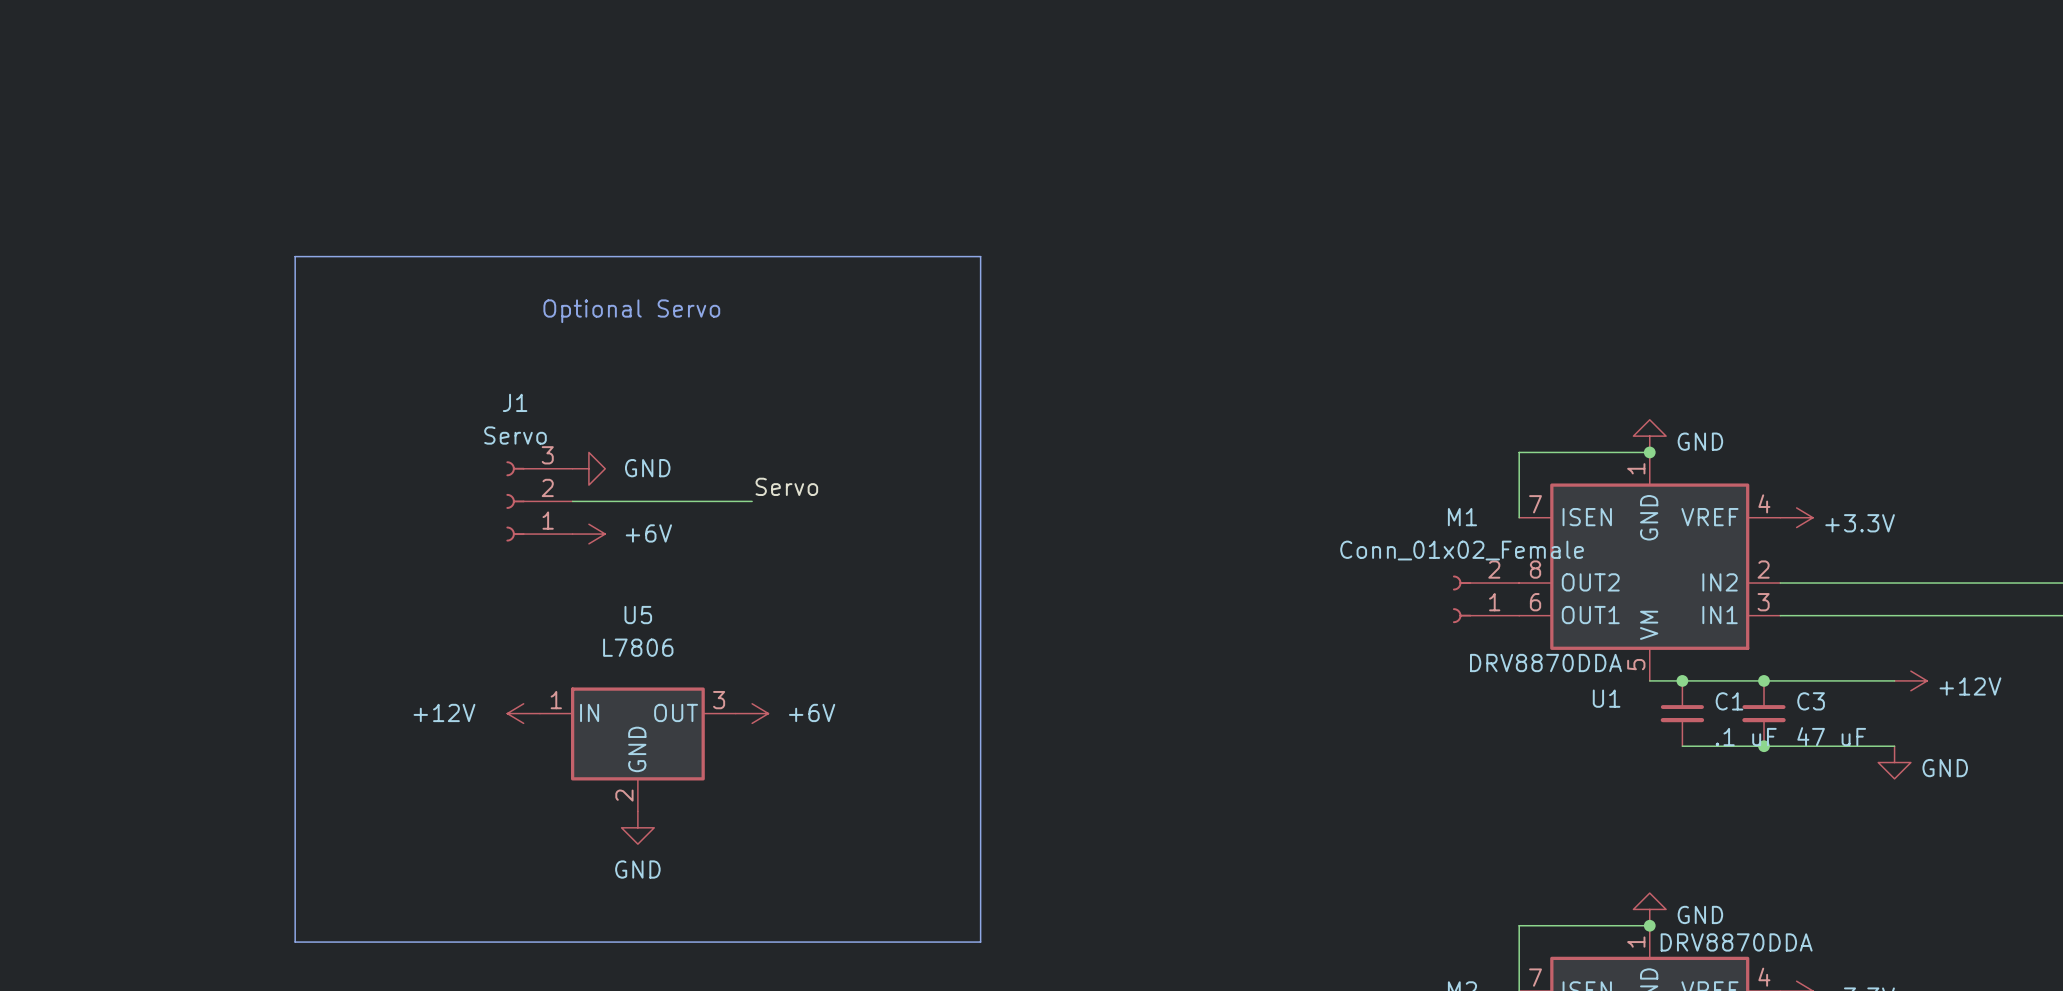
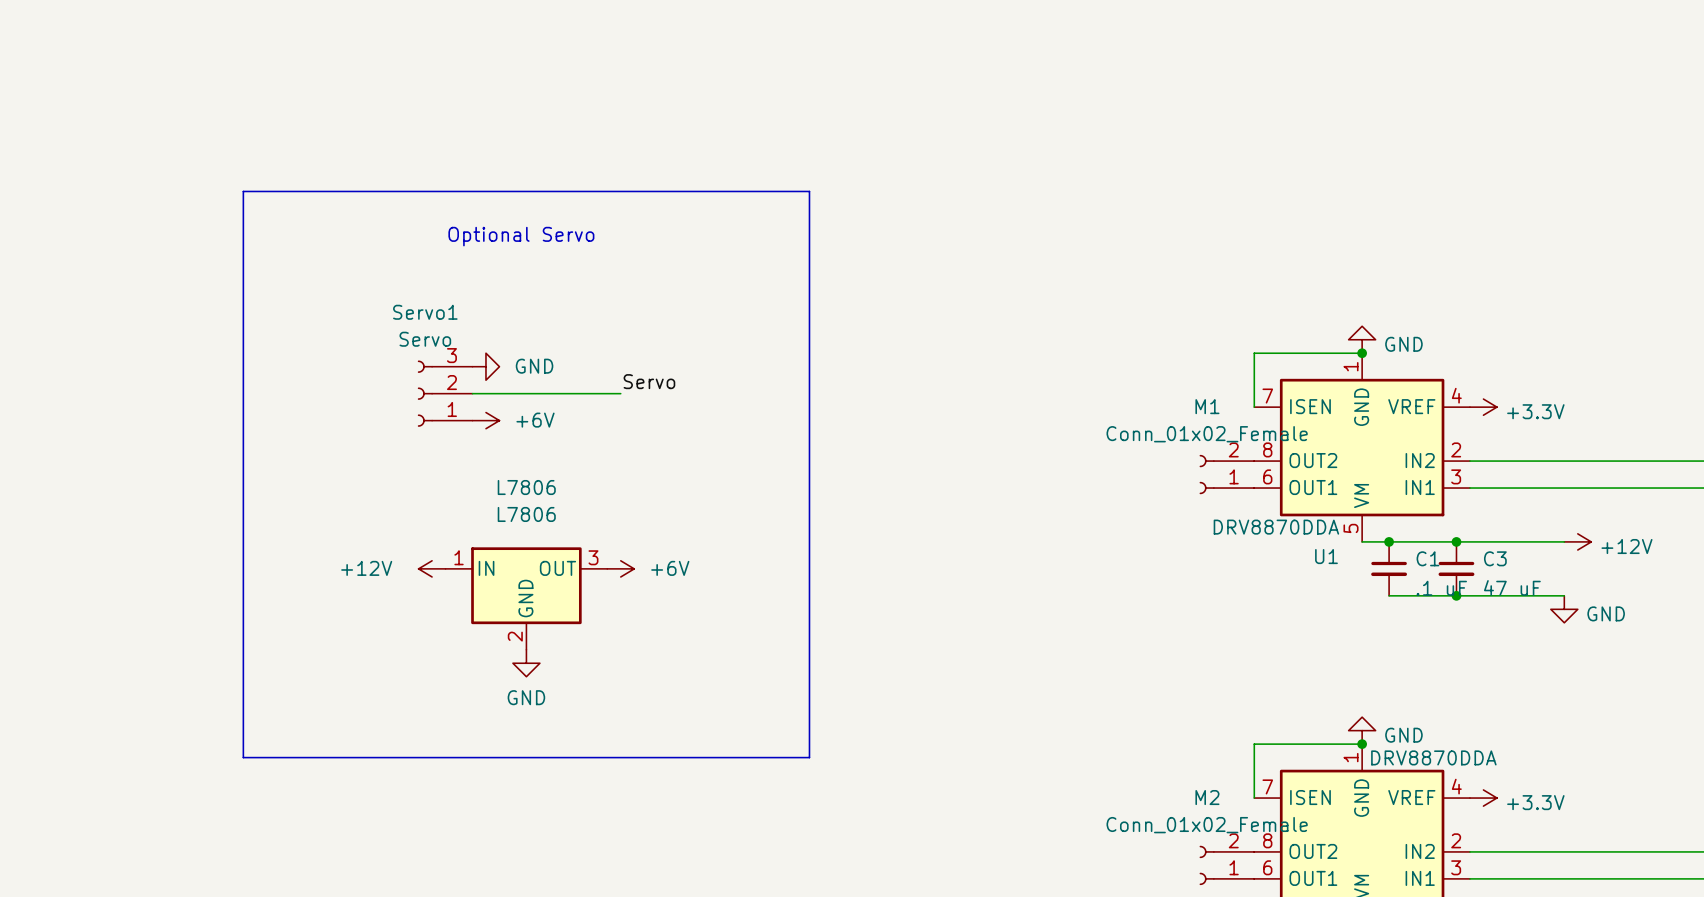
J1 name: J1 (515, 402) -> Servo1 (425, 312)
U5 name: U5 (638, 615) -> L7806 (526, 487)

